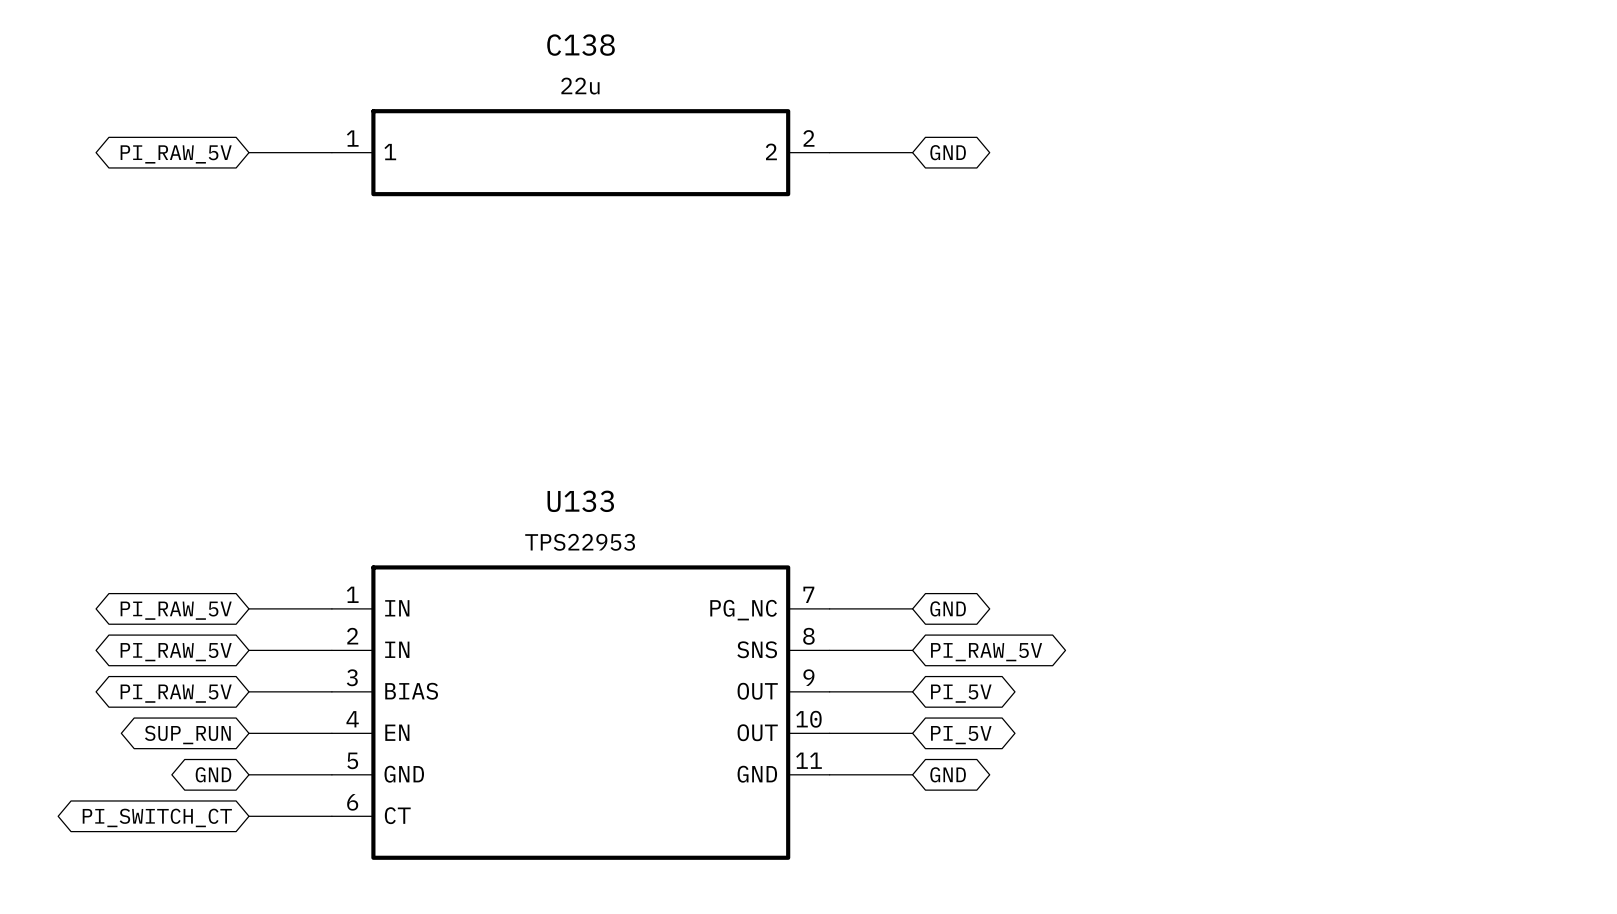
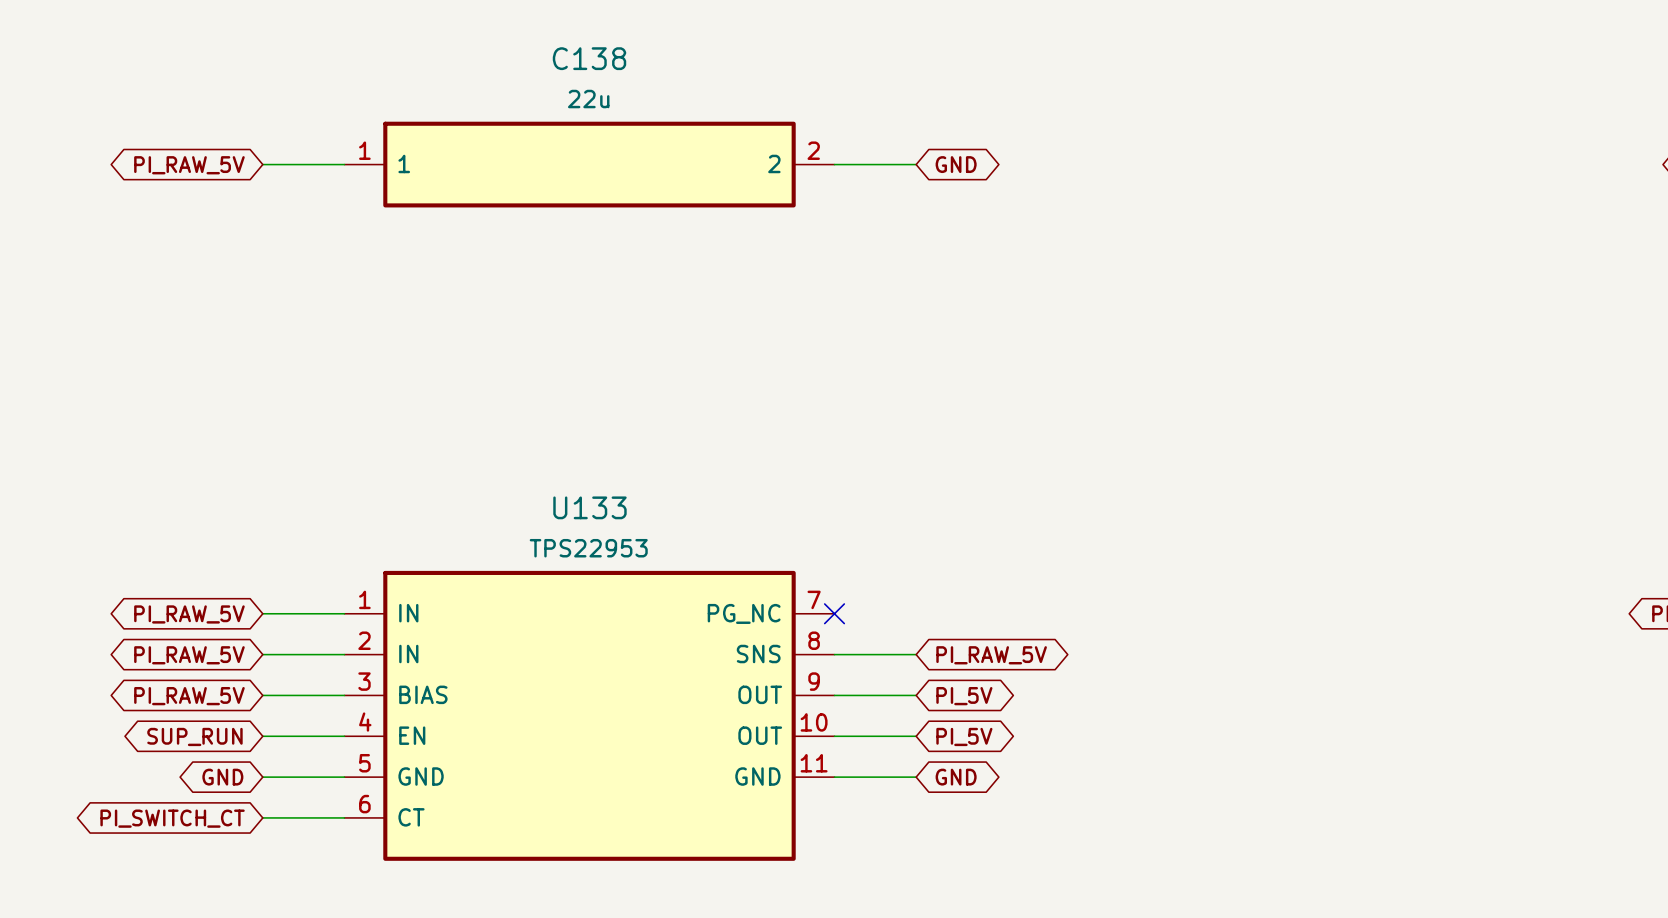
wire: (829, 608) (912, 608) -> none
no-connect mark: none -> (834, 613)
global label: GND (948, 608) -> none

